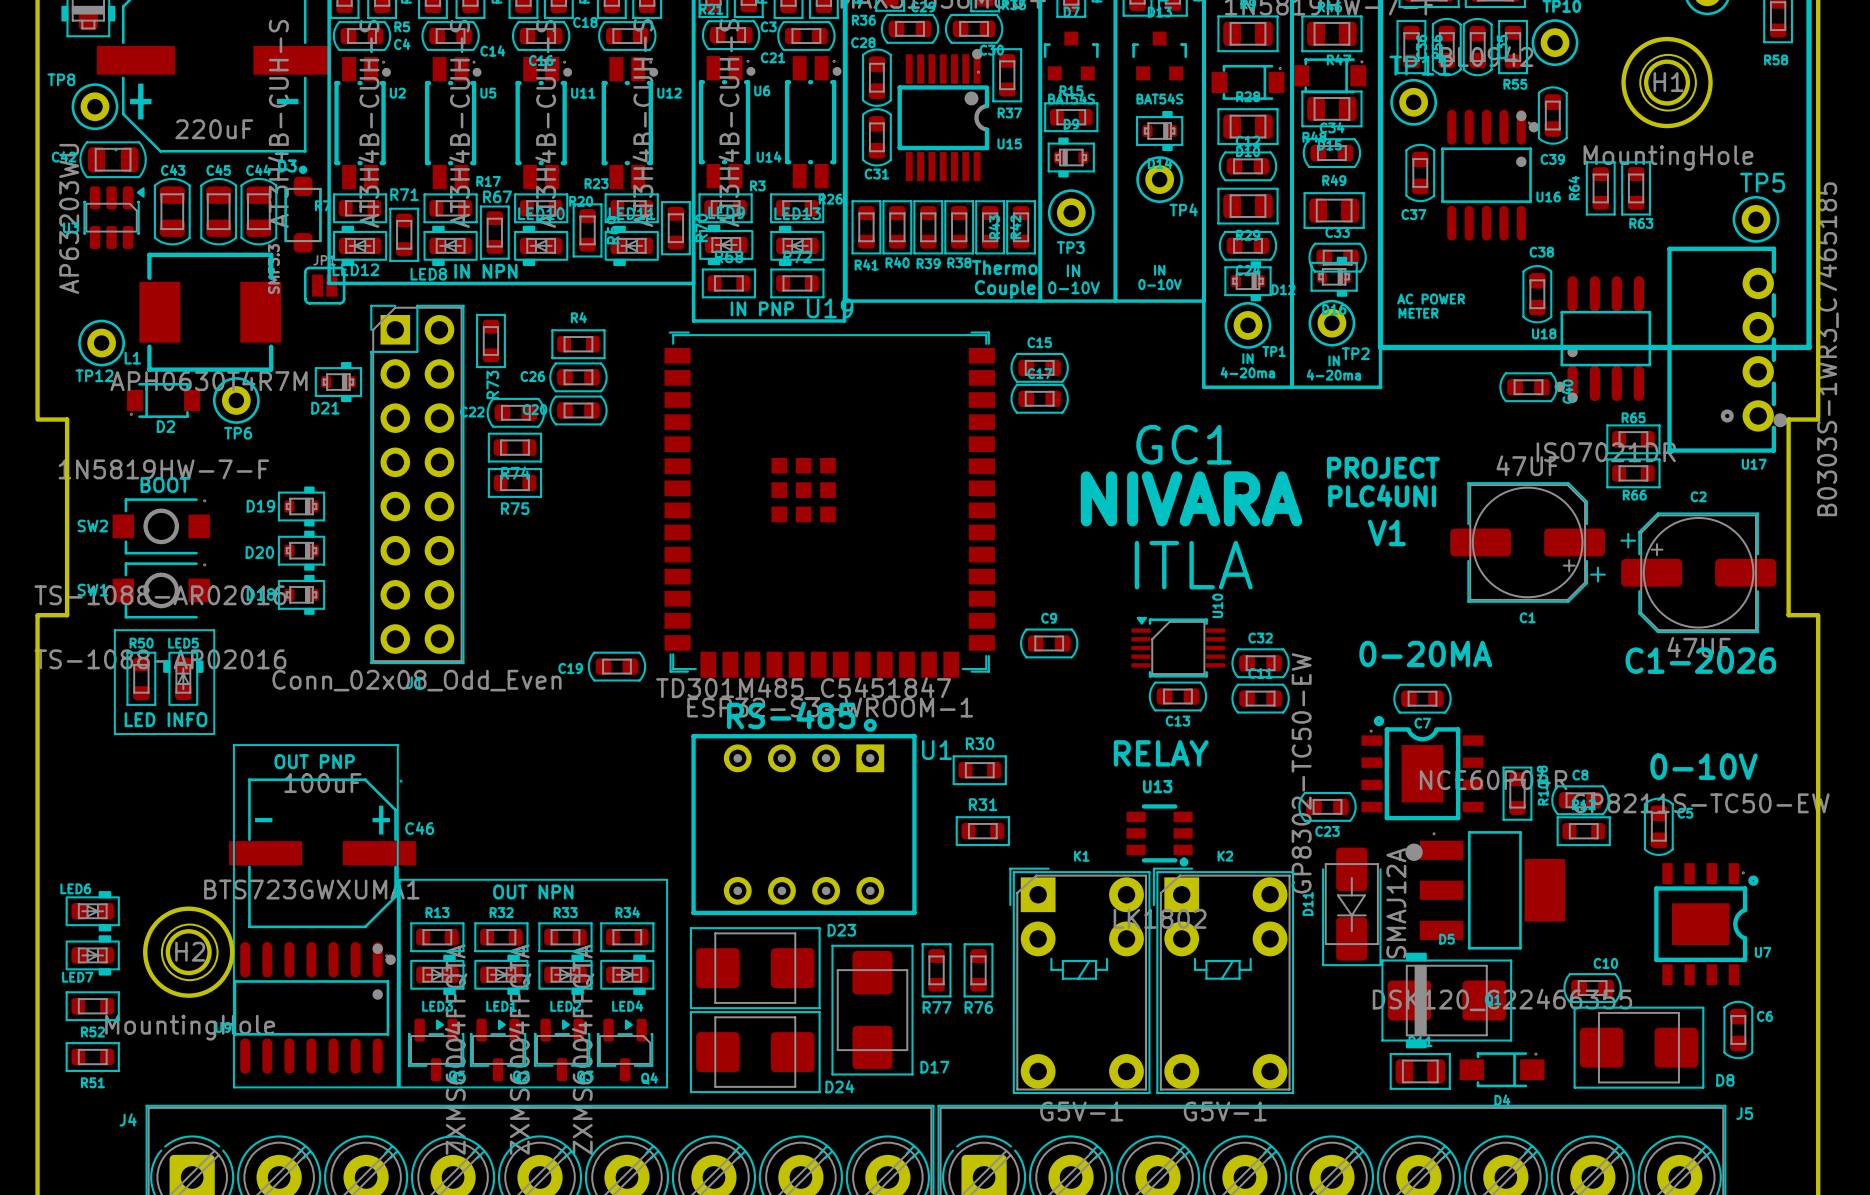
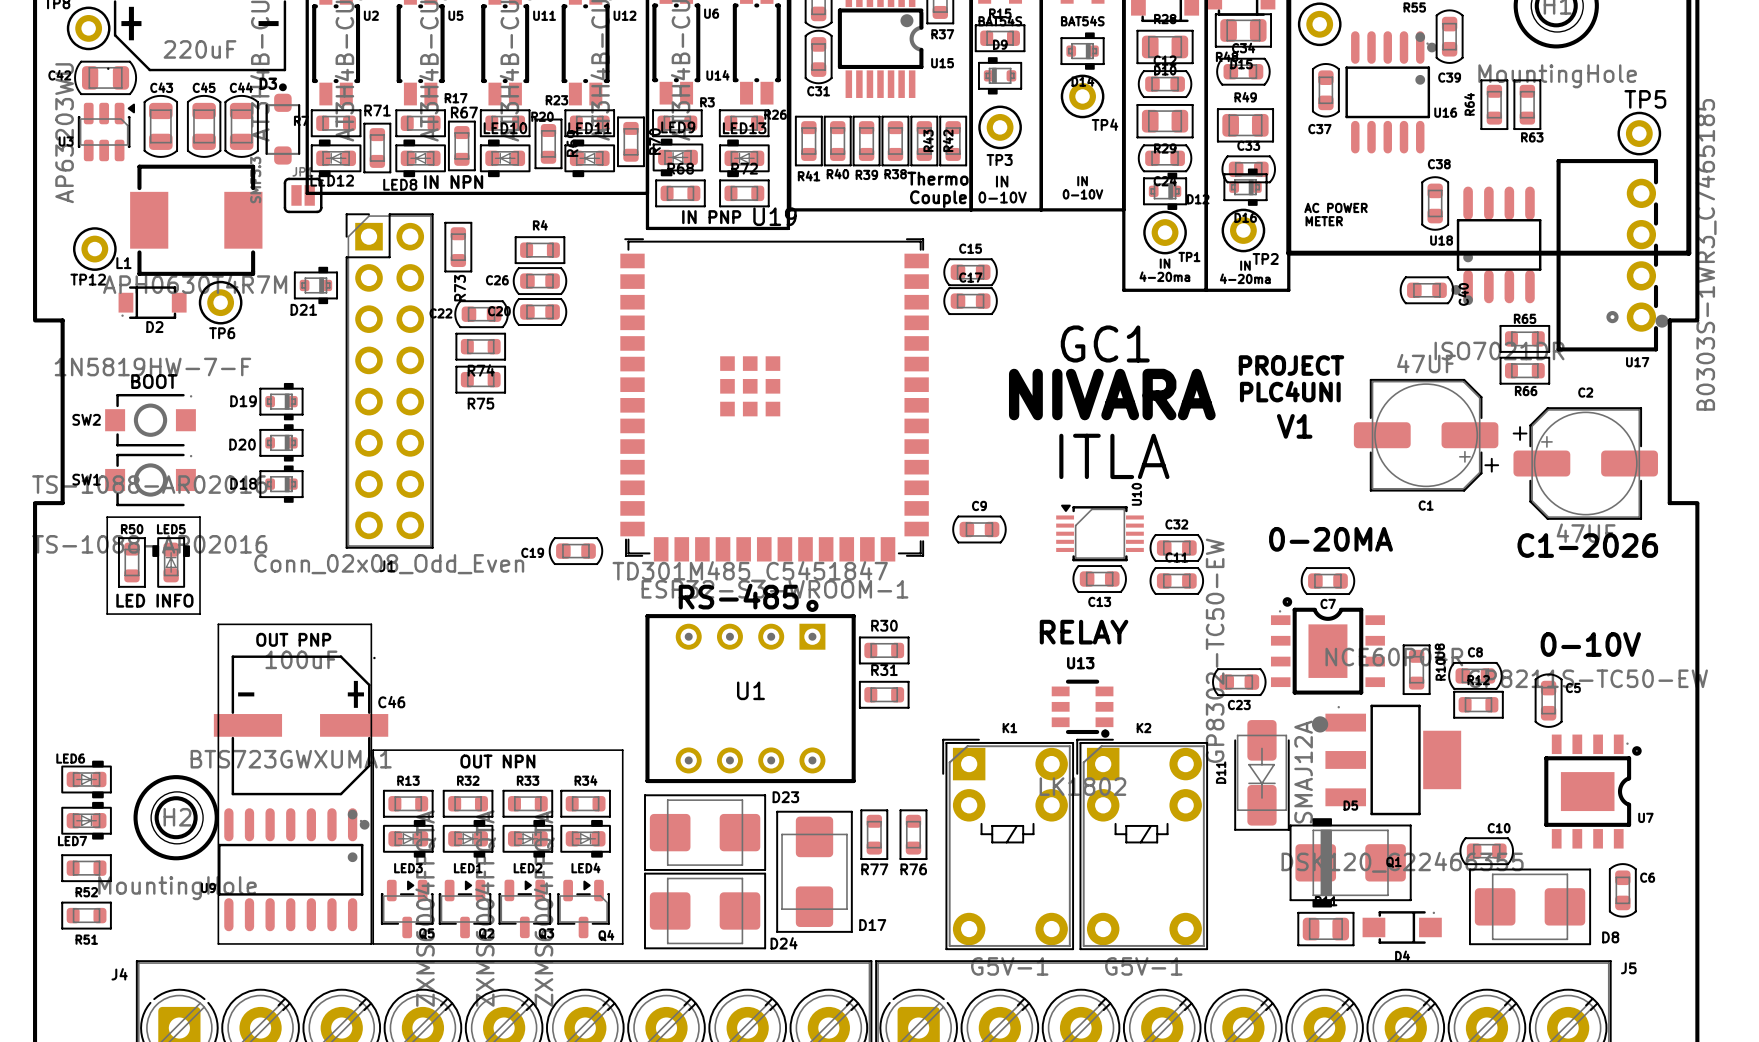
U1 name position: U1 (936, 750) -> U1 (750, 690)
R30 position: (979, 770) -> (884, 650)
R31 position: (982, 831) -> (884, 694)

